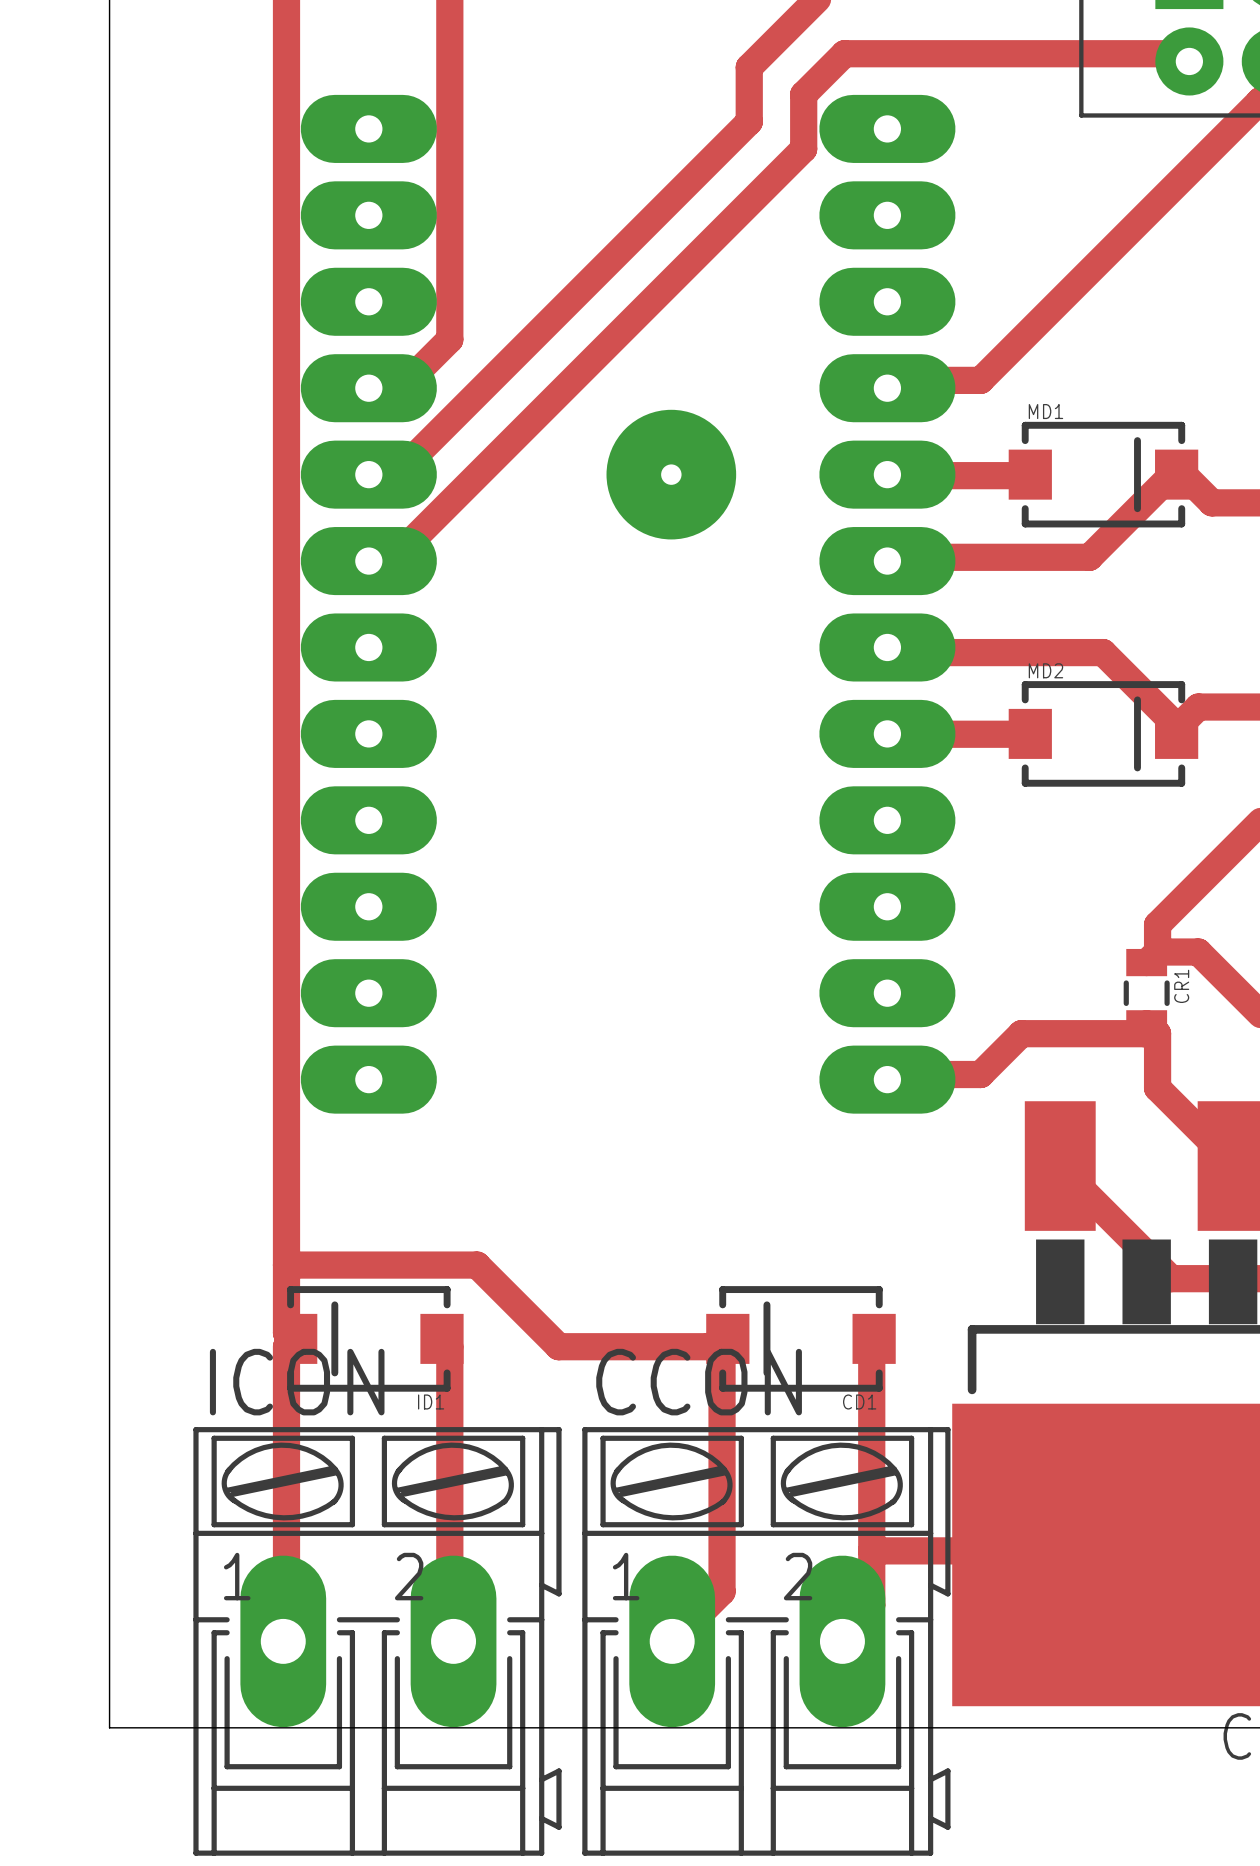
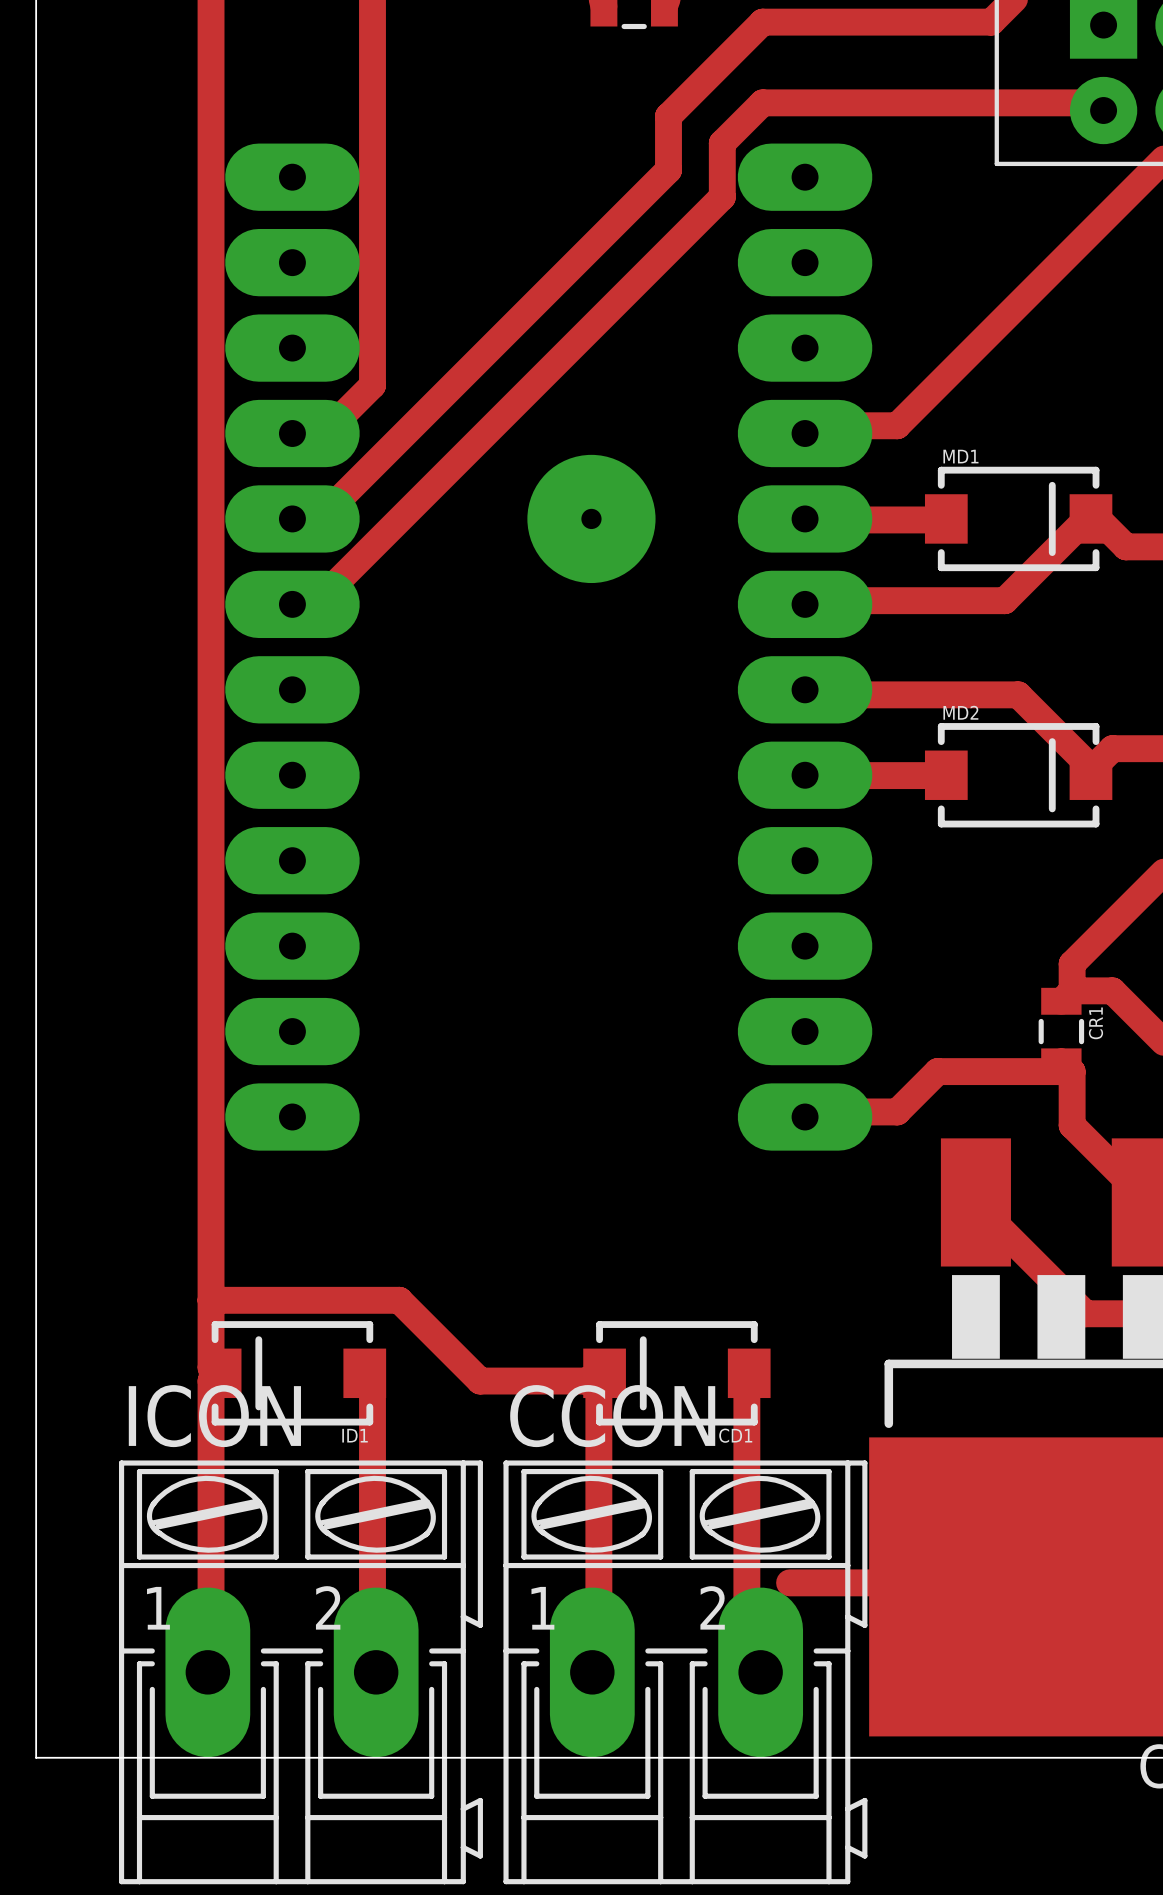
CD1 position: (800, 1338) -> (676, 1373)
track: (874, 1338) (871, 1346) (871, 1605) (844, 1632) -> (749, 1373) (746, 1381) (746, 1636) (762, 1663)
track: (678, 1346) (708, 1346) (727, 1338) (722, 1346) (722, 1591) (681, 1632) -> (585, 1381) (604, 1373) (598, 1381) (598, 1623) (601, 1663)

